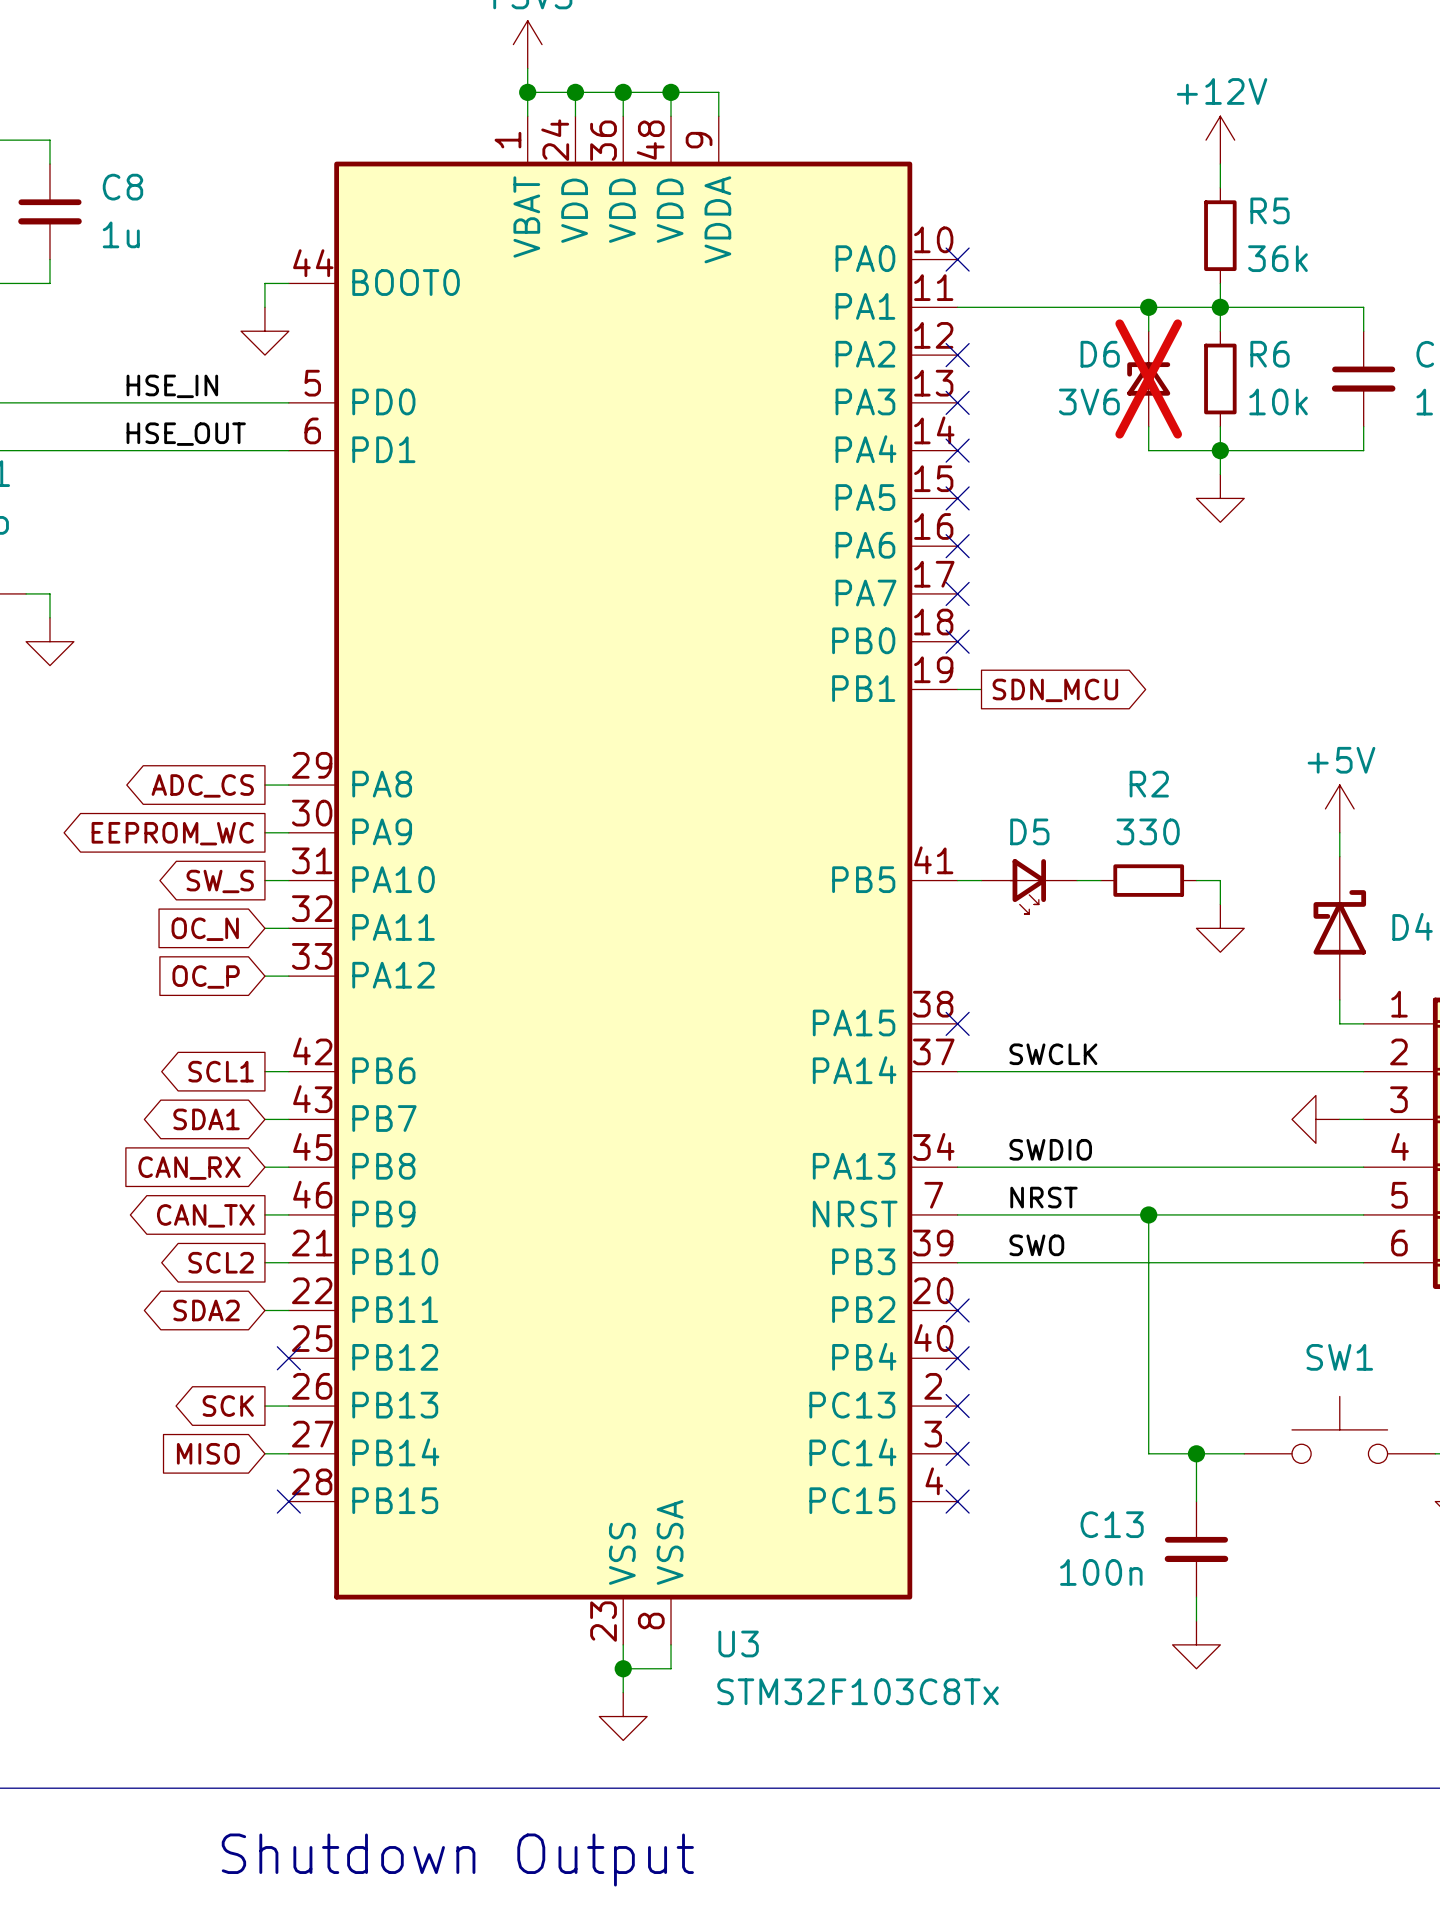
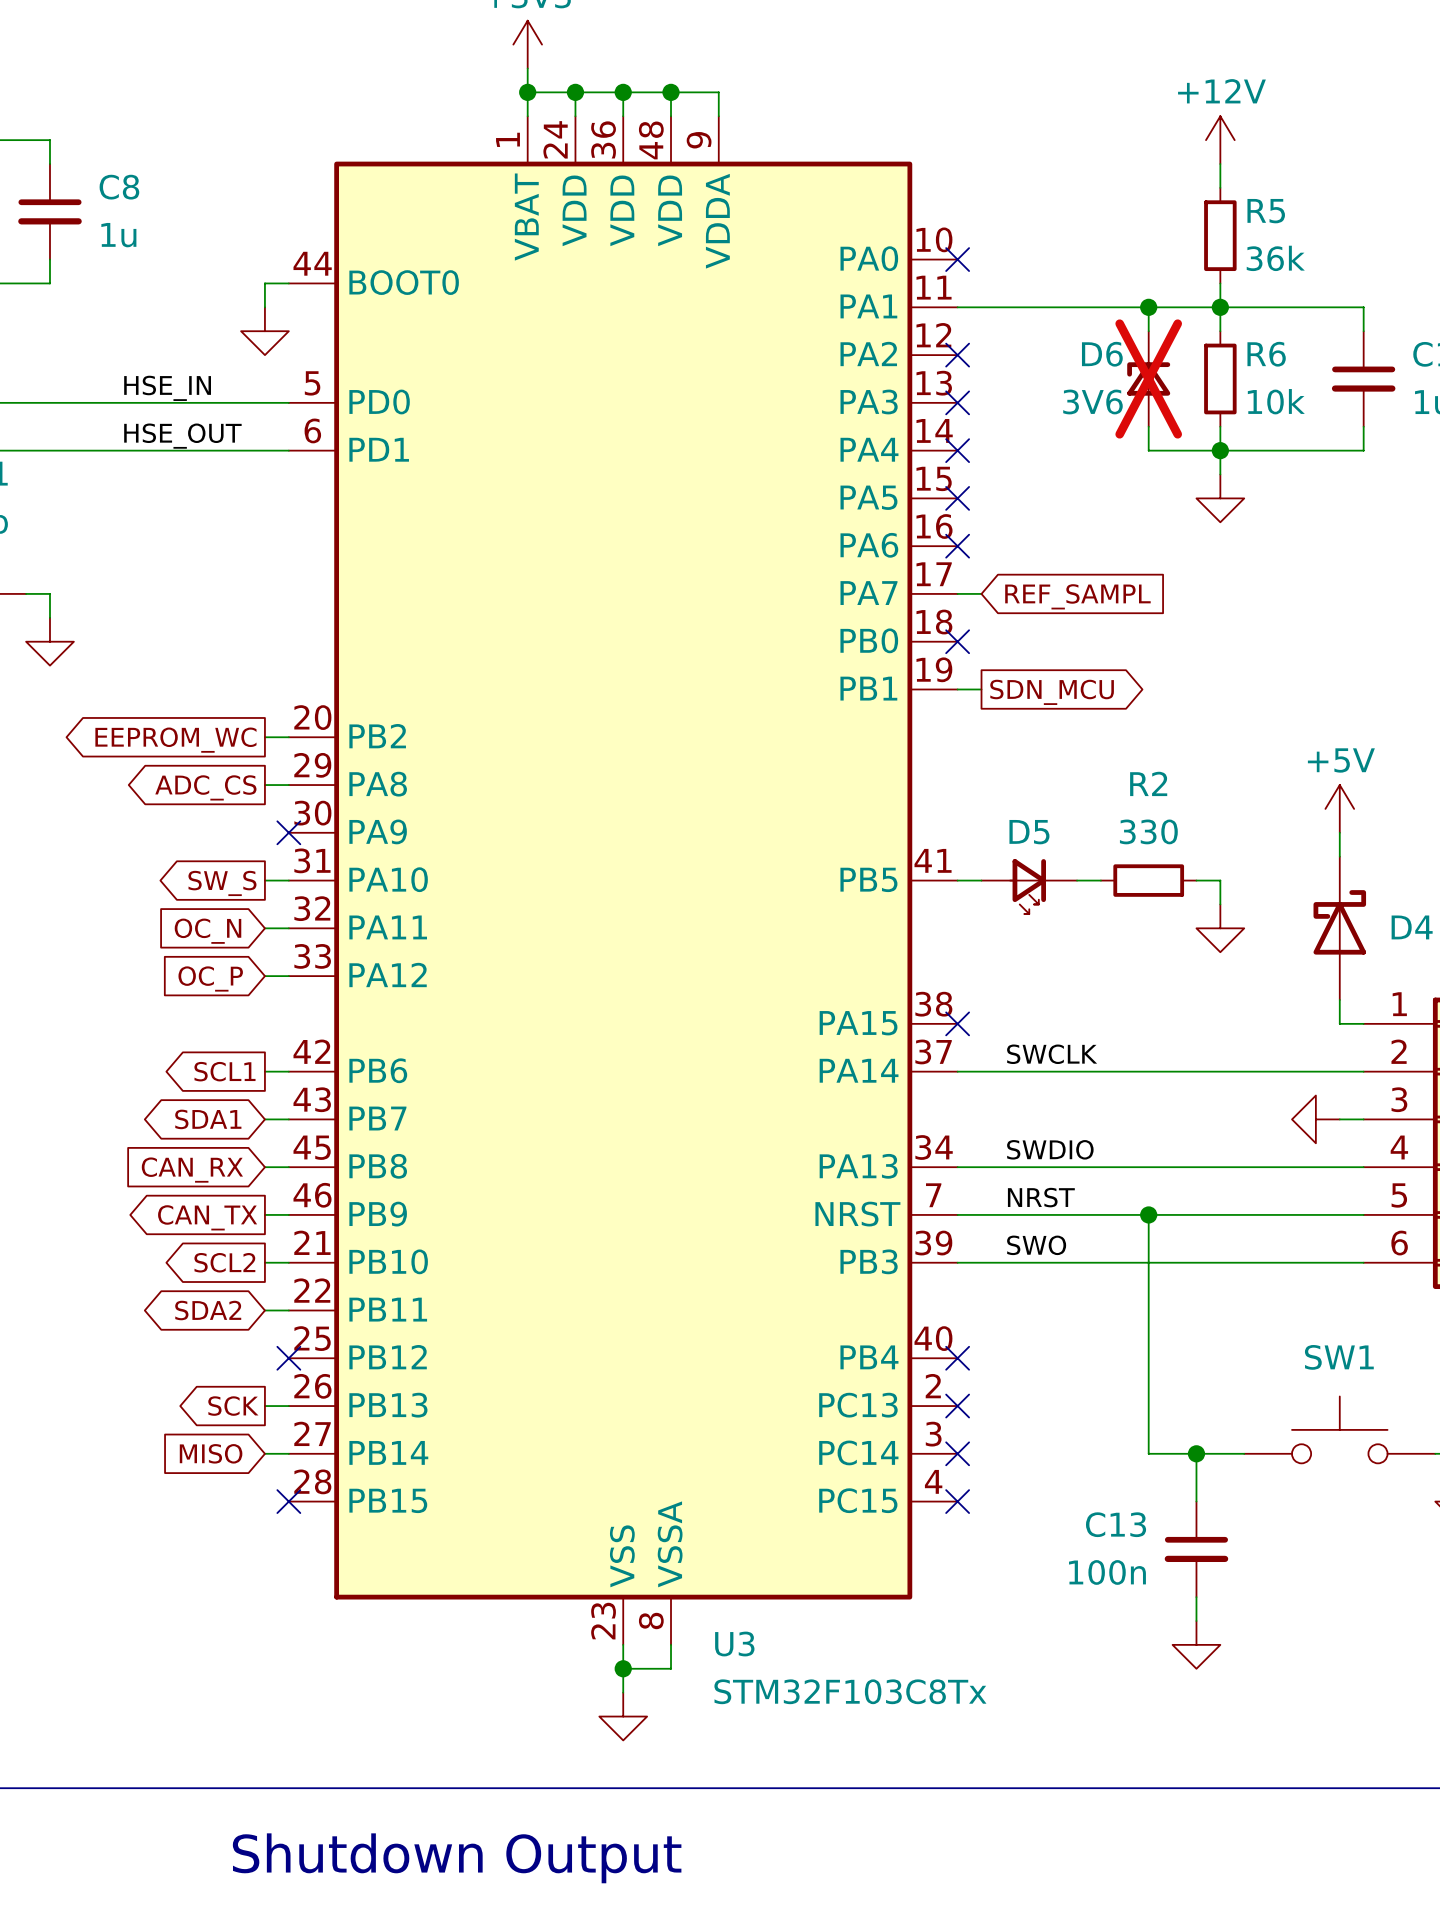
U3 symbol: [288, 116, 958, 1645] -> [288, 116, 958, 1645]
wire: none -> (957, 593) (981, 593)
no-connect mark: (957, 593) -> none
global label: none -> REF_SAMPL (1077, 596)
wire: (264, 832) (288, 832) -> (264, 737) (288, 737)
no-connect mark: none -> (288, 832)
global label position: EEPROM_WC (172, 833) -> EEPROM_WC (175, 740)
no-connect mark: (957, 1310) -> none

